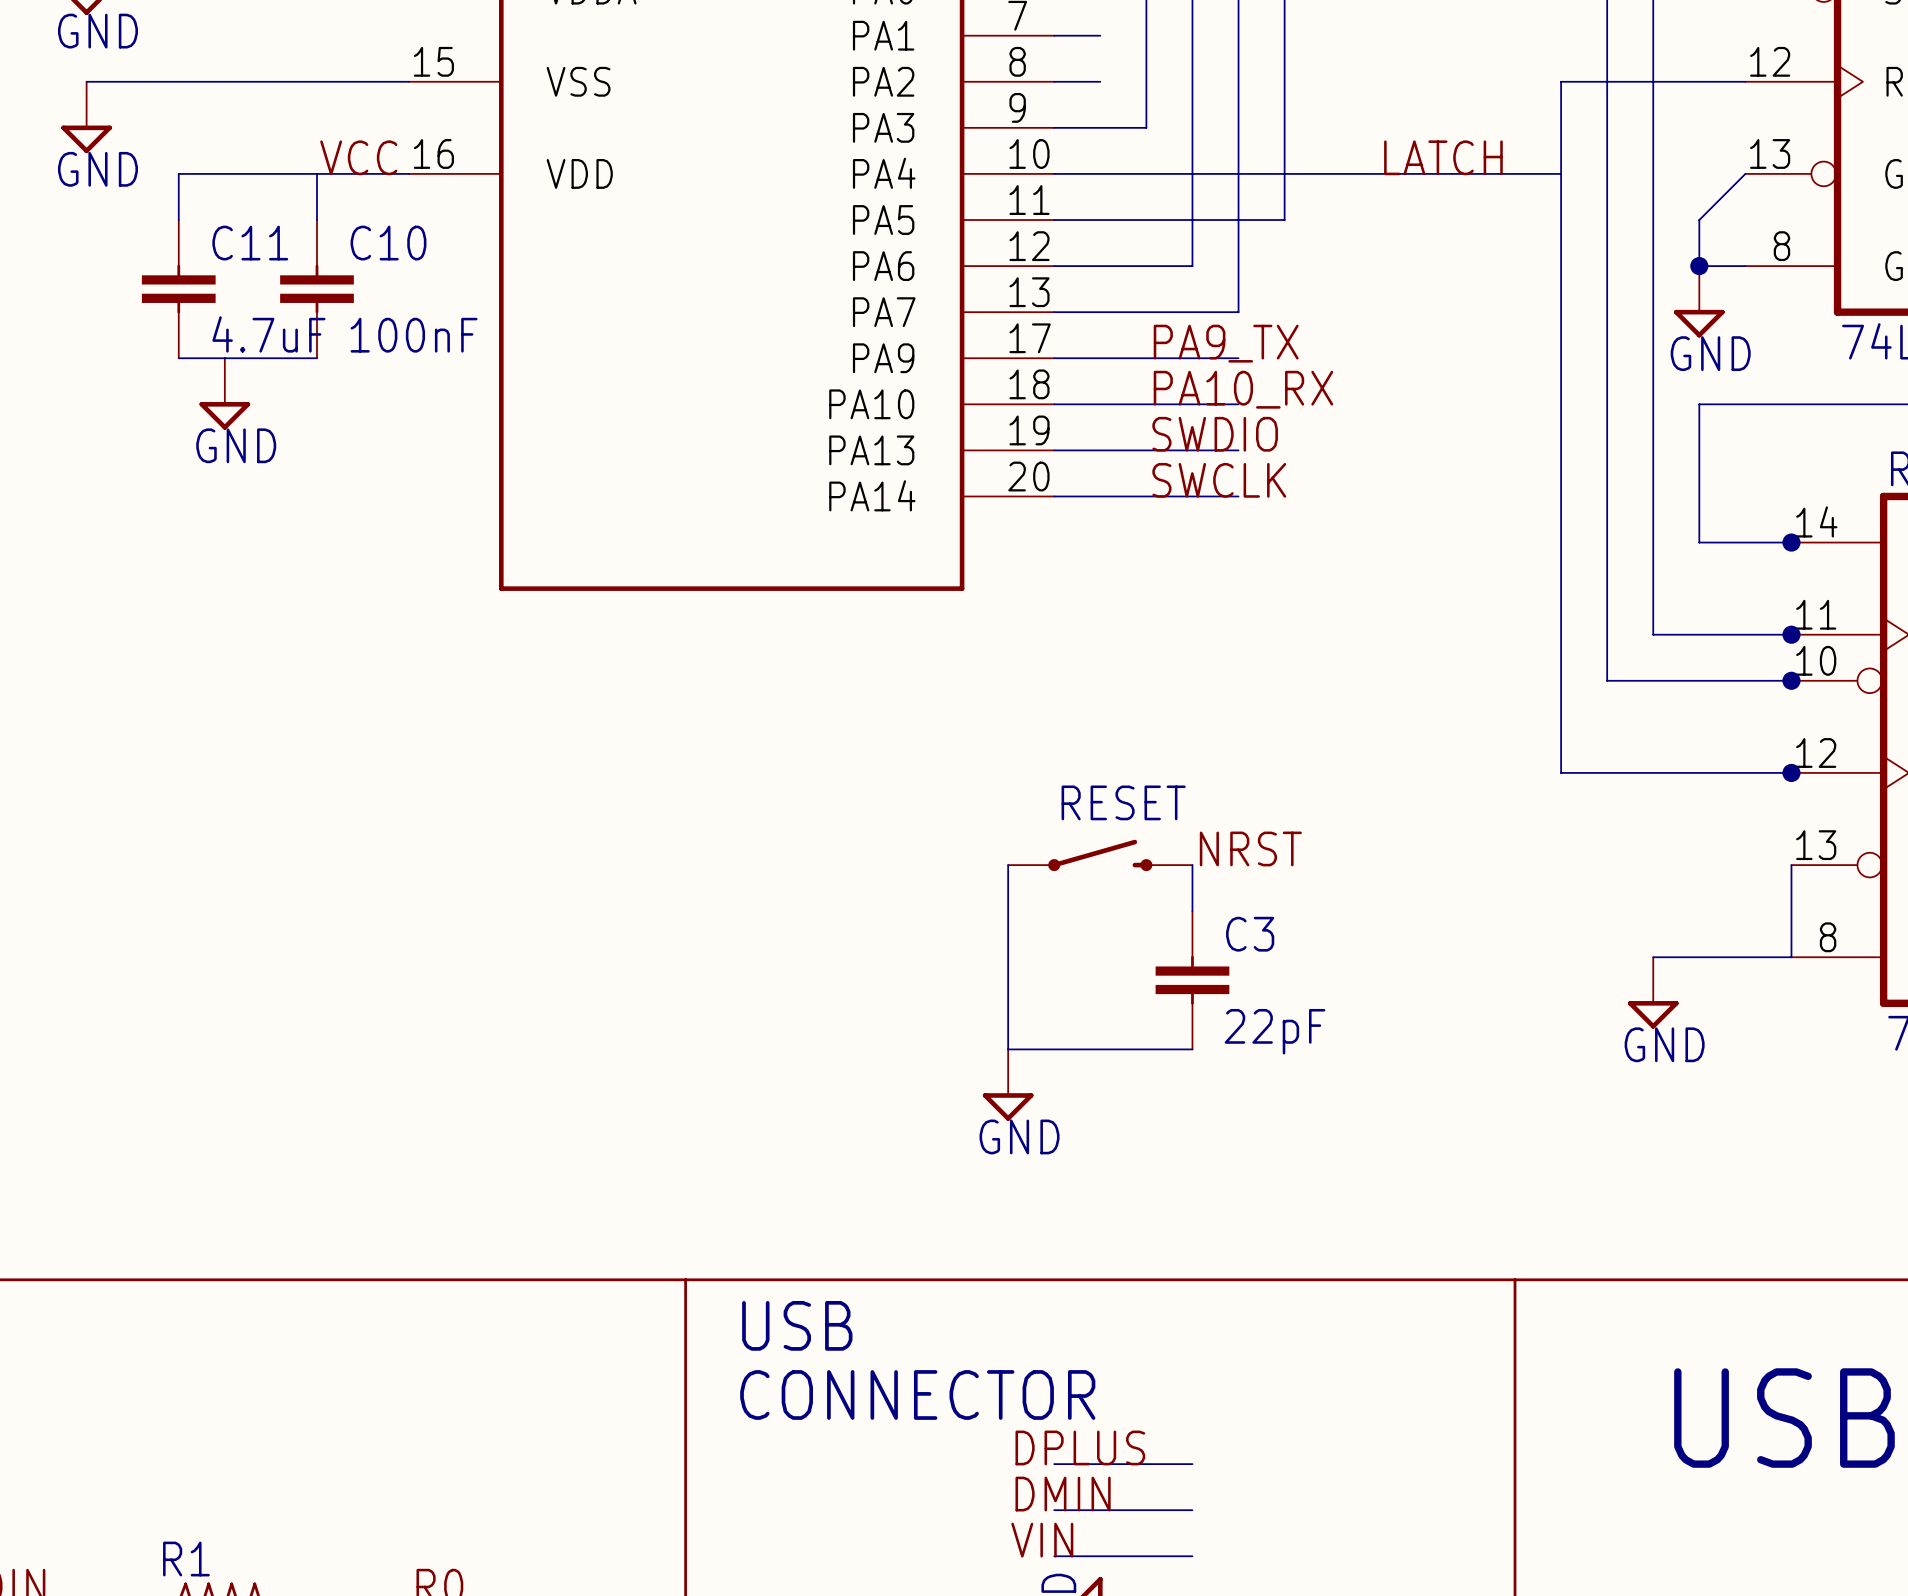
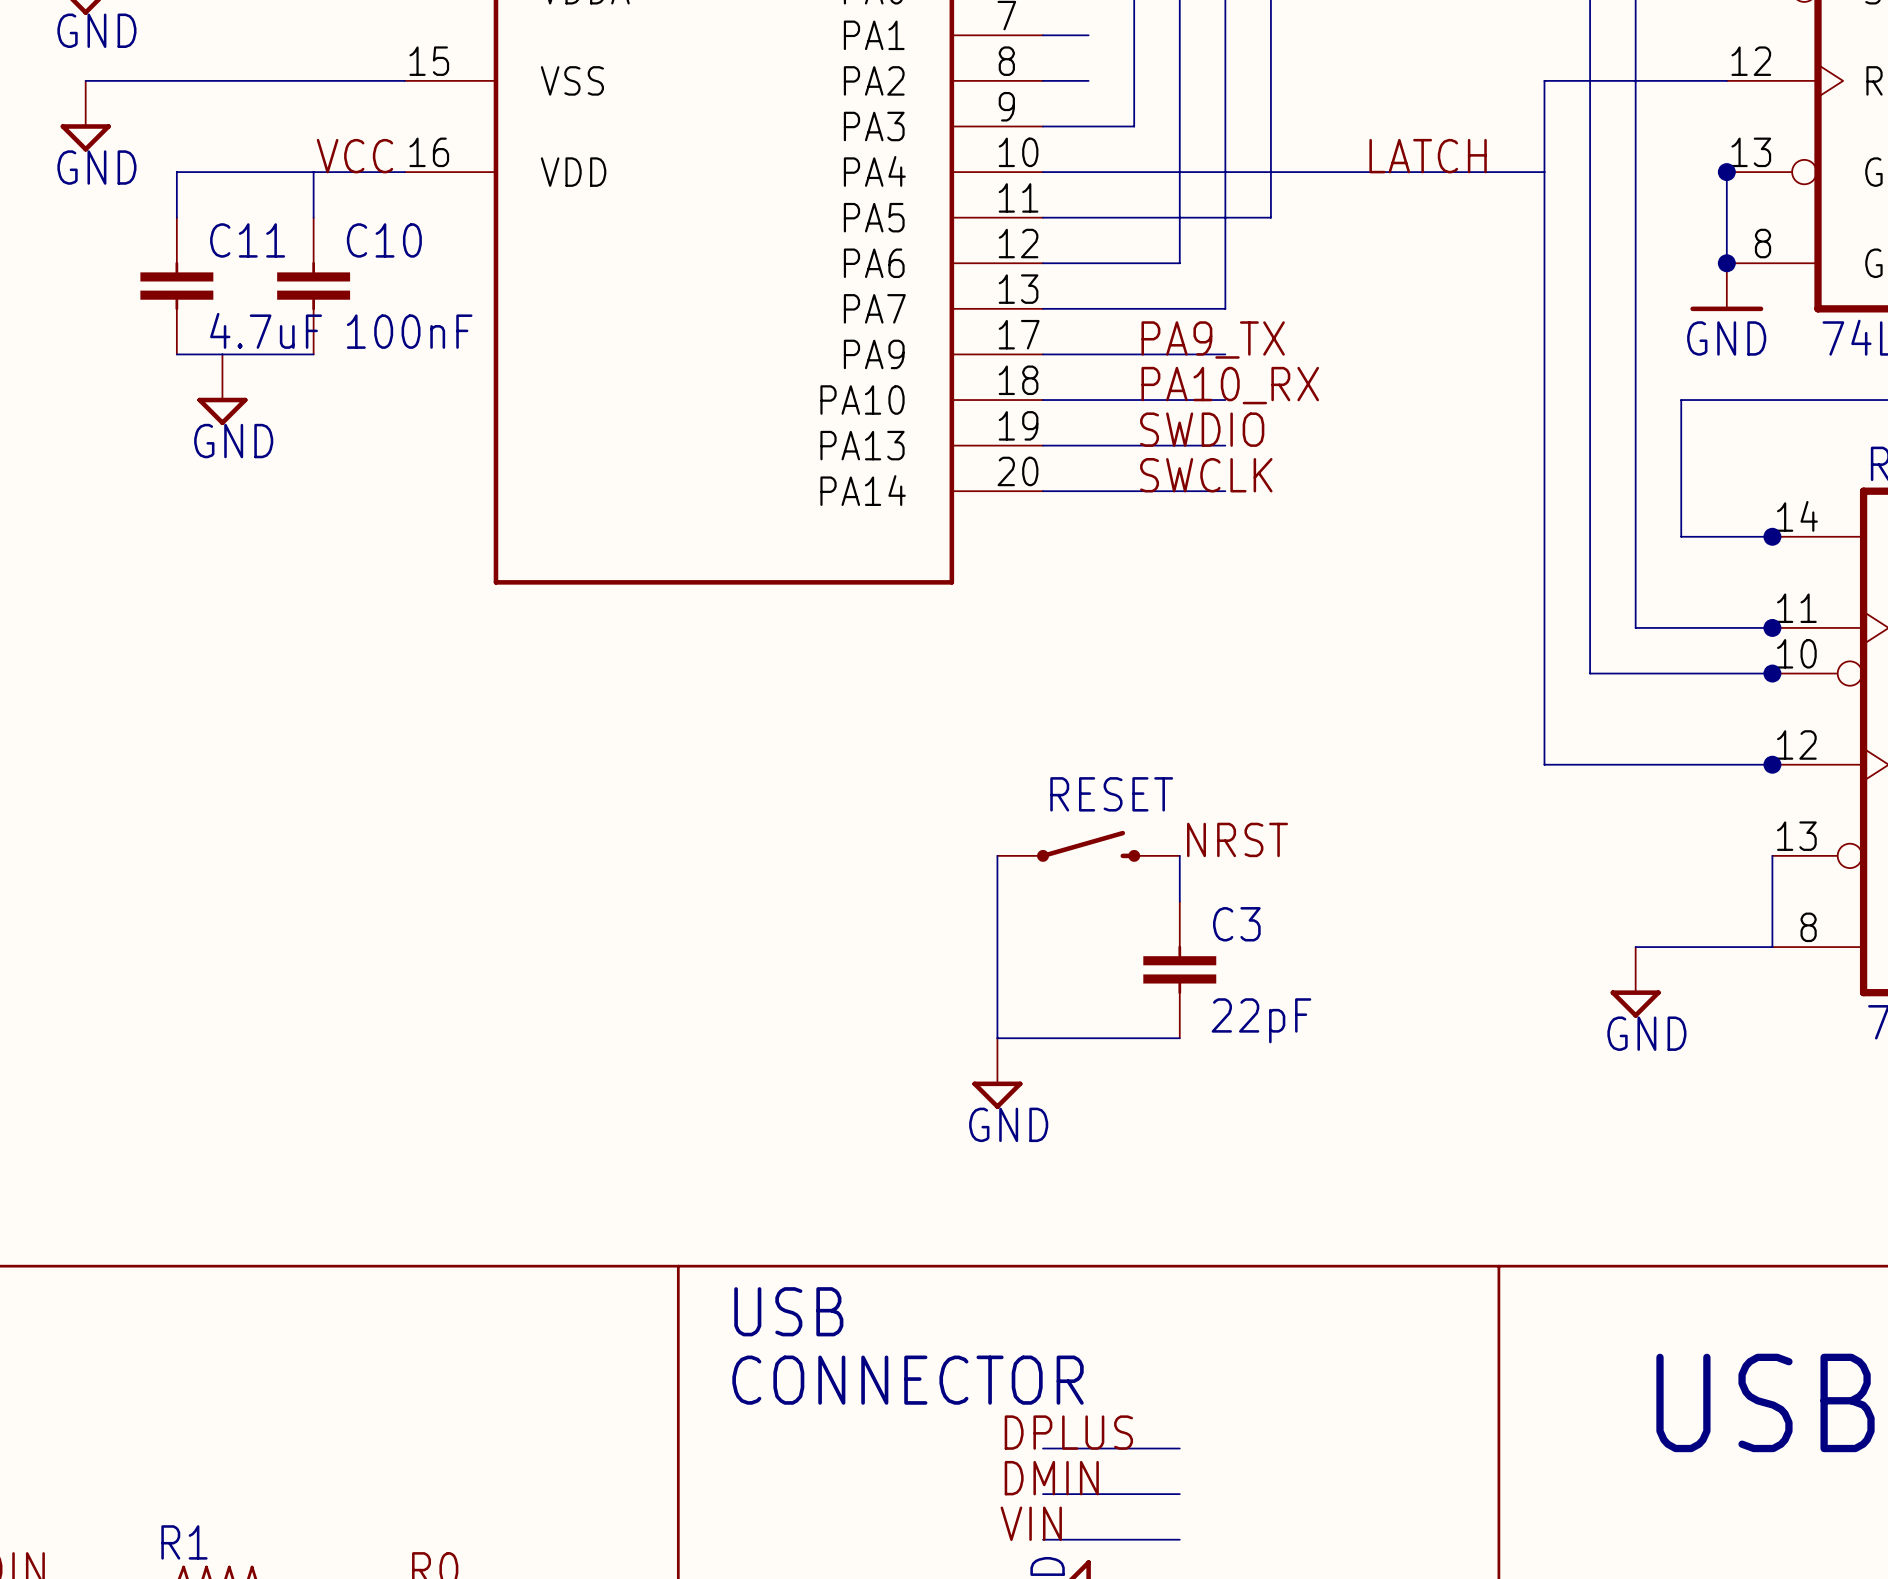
wire: (1745, 173) (1699, 220) (1699, 266) (1745, 266) -> (1726, 172) (1726, 263)
junction: none -> (1726, 172)
junction position: (1699, 266) -> (1726, 263)
power symbol: none -> GND (1726, 287)
power symbol: GND (1699, 301) -> none

